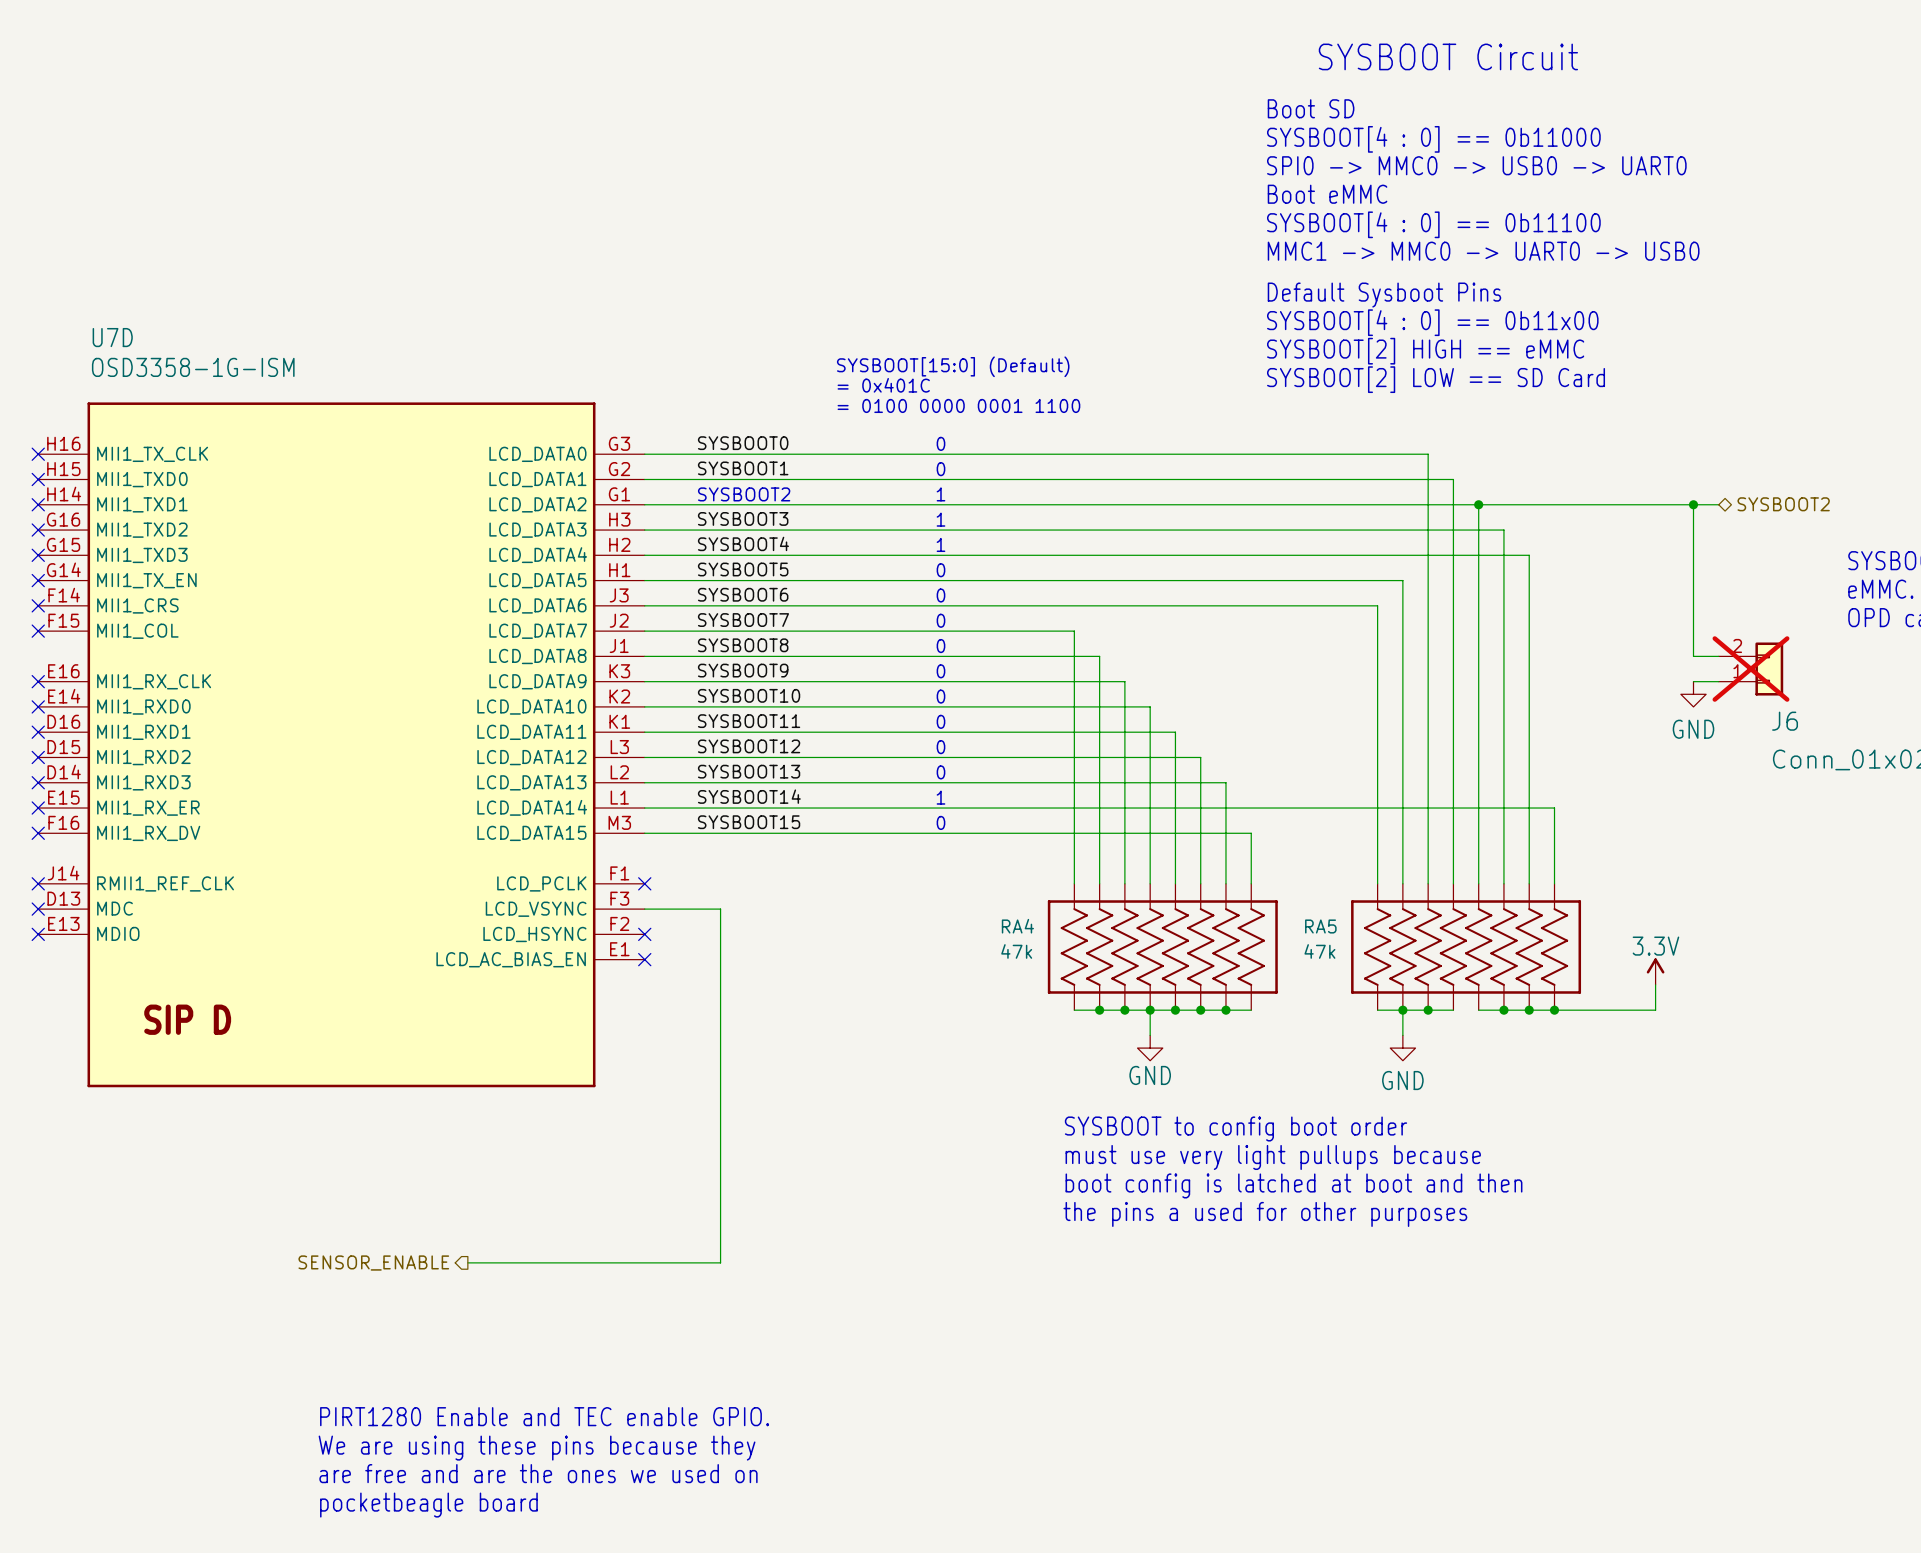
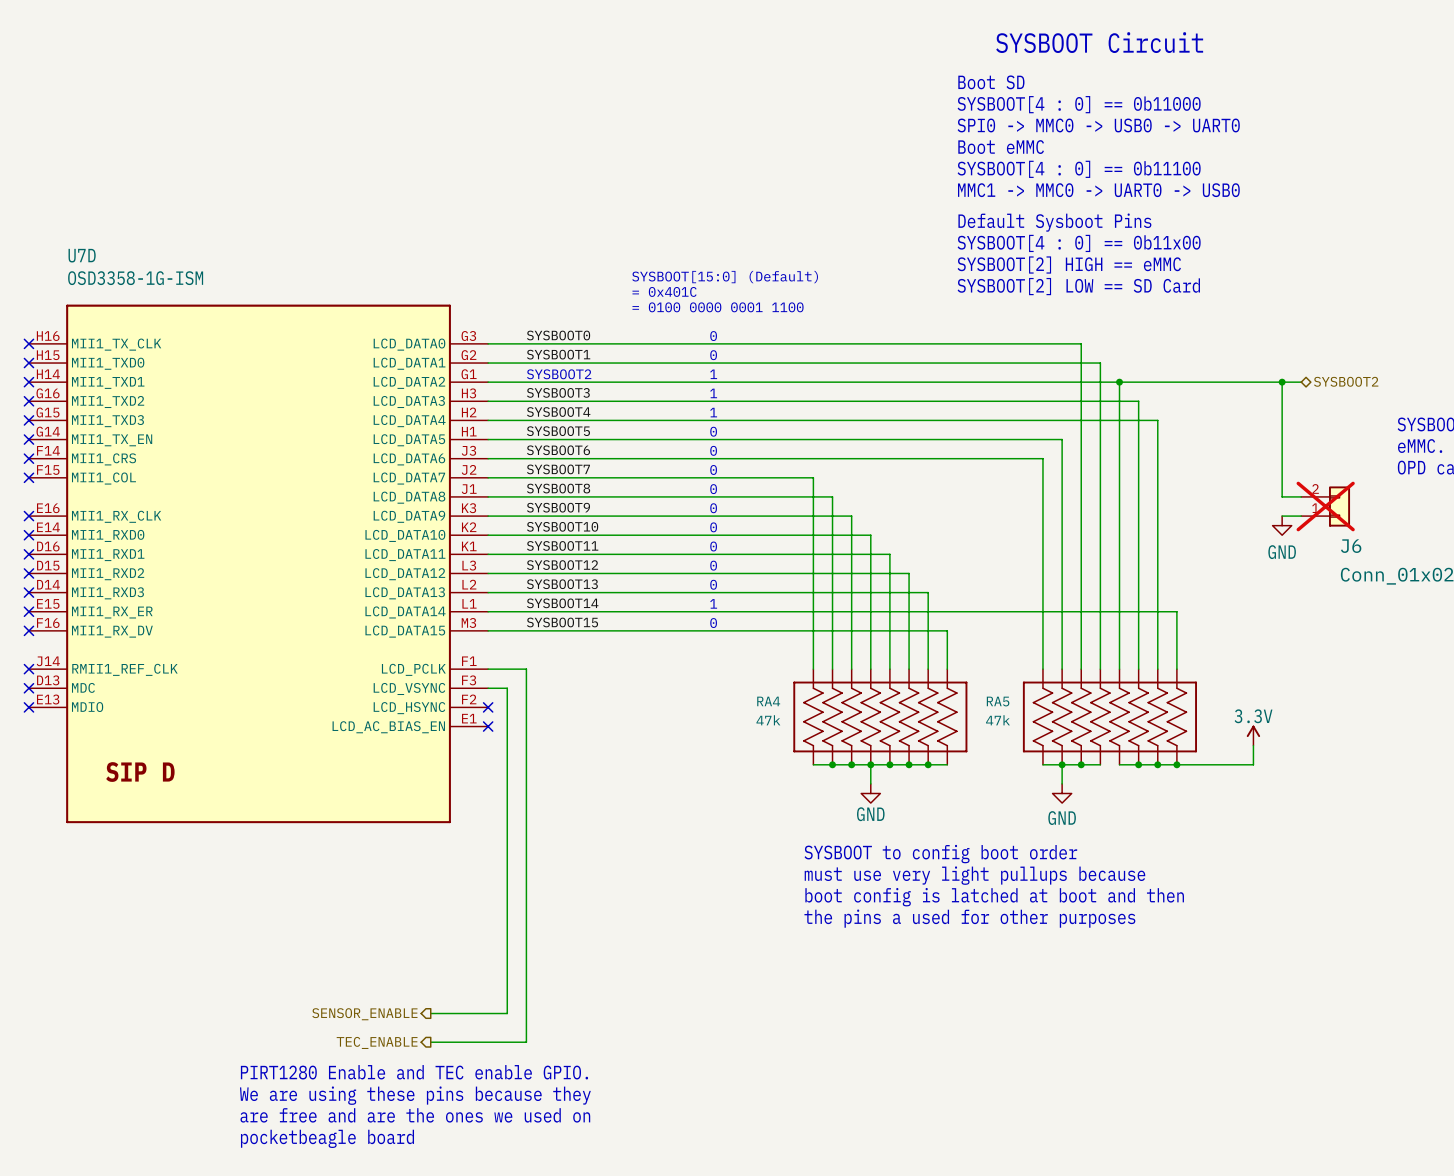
wire: none -> (488, 669) (526, 669) (526, 1042) (430, 1042)
no-connect mark: (644, 883) -> none
wire: (670, 909) (720, 909) (720, 1262) (467, 1262) -> (507, 688) (507, 1013) (430, 1013)
hierarchical label position: SENSOR_ENABLE (373, 1263) -> SENSOR_ENABLE (364, 1014)
hierarchical label: none -> TEC_ENABLE (377, 1042)

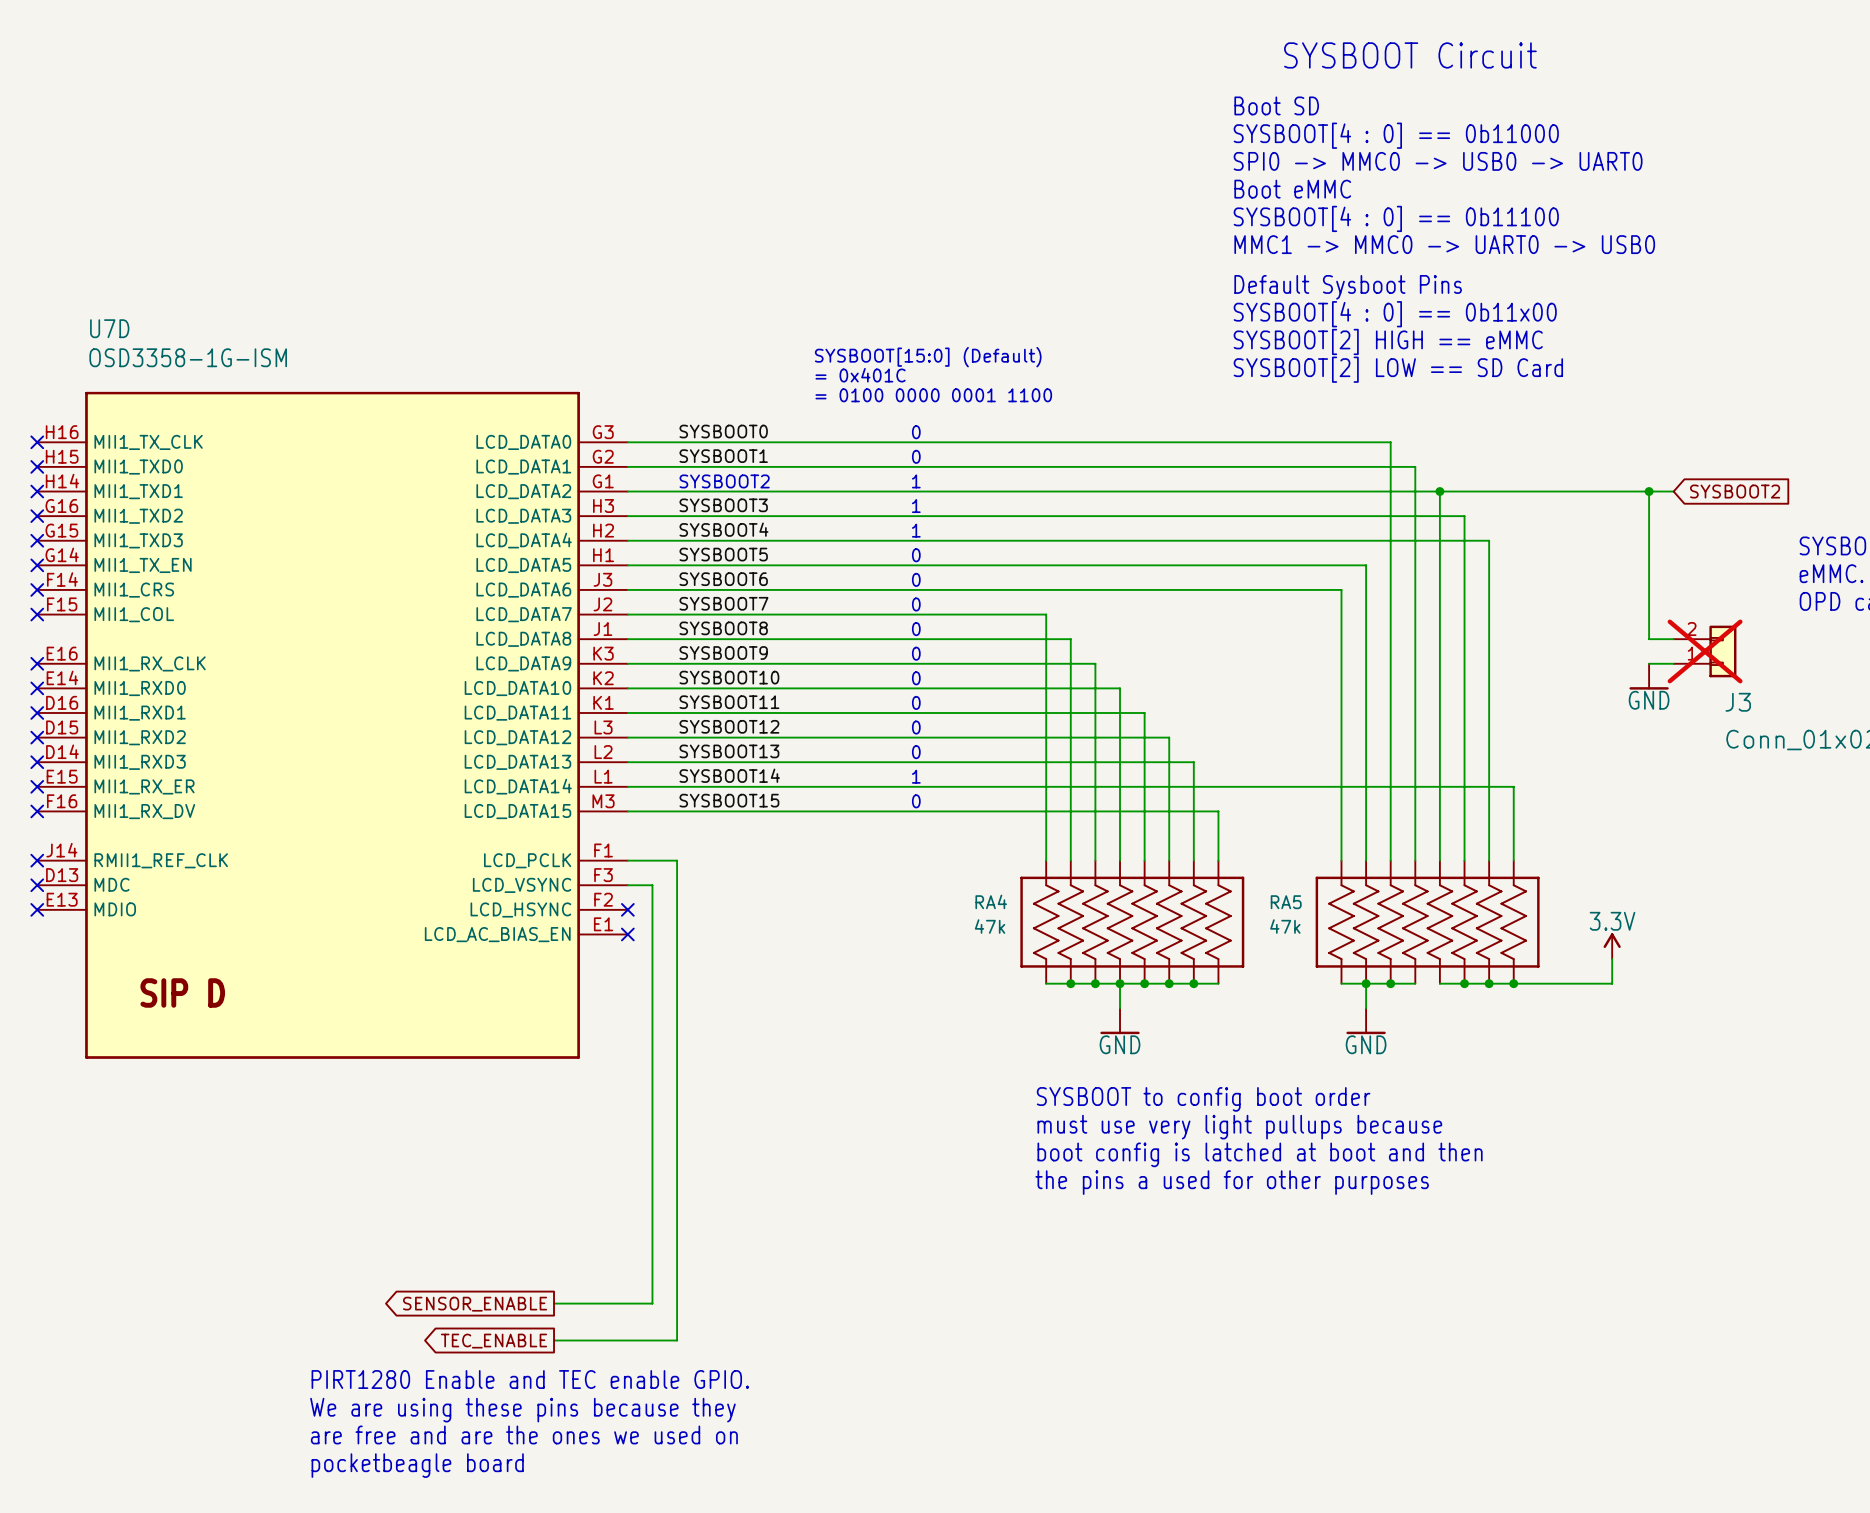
hierarchical label: SYSBOOT2 (1346, 381) -> none
global label: none -> SYSBOOT2 (1735, 491)
power symbol shape: [1272, 516, 1292, 536] -> [1629, 663, 1669, 690]
J6 name: J6 (1351, 546) -> J3 (1738, 702)
power symbol shape: [861, 783, 881, 804] -> [1100, 1008, 1140, 1035]
power symbol shape: [1052, 783, 1072, 804] -> [1346, 1008, 1386, 1035]
hierarchical label: SENSOR_ENABLE (364, 1014) -> none
global label: none -> SENSOR_ENABLE (475, 1304)
hierarchical label: TEC_ENABLE (377, 1042) -> none
global label: none -> TEC_ENABLE (493, 1341)

